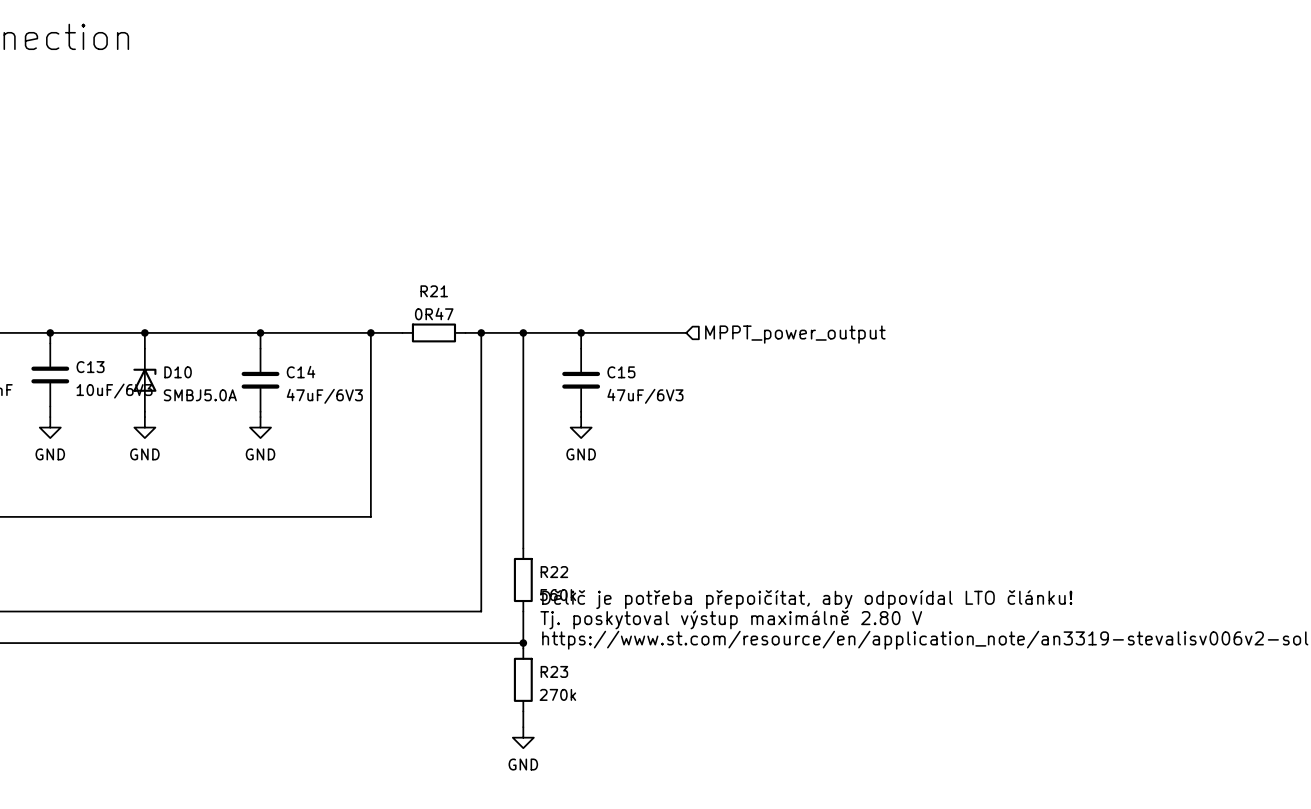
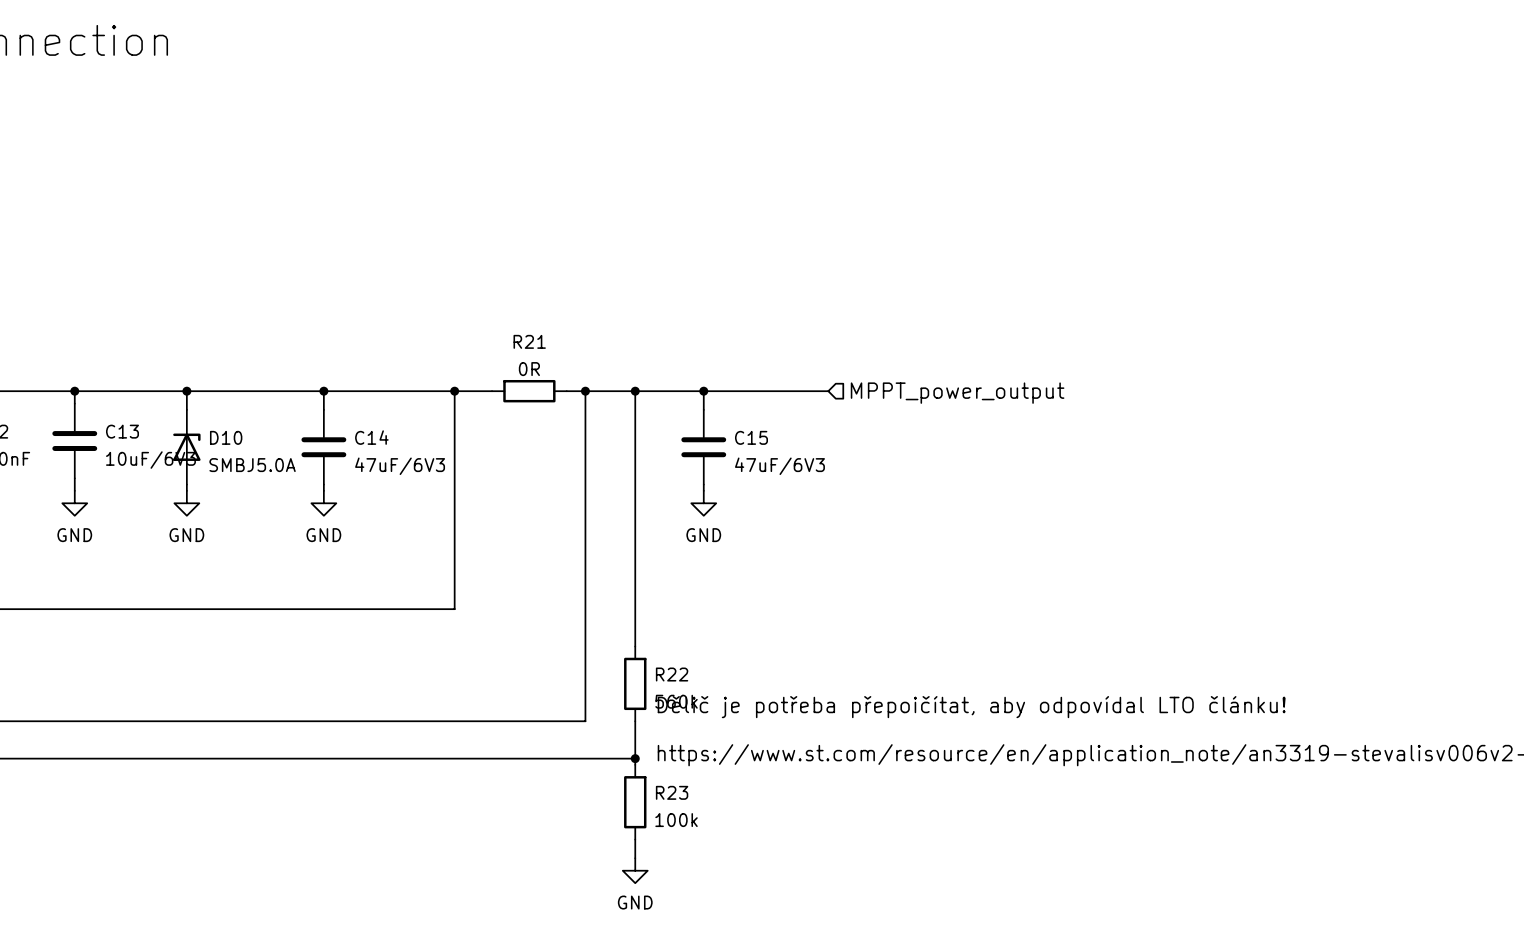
R21 value: 0R47 (434, 314) -> 0R (529, 369)
text: Tj. poskytoval výstup maximálně 2.80 V (731, 619) -> none
R23 value: 270k (557, 694) -> 100k (676, 820)

